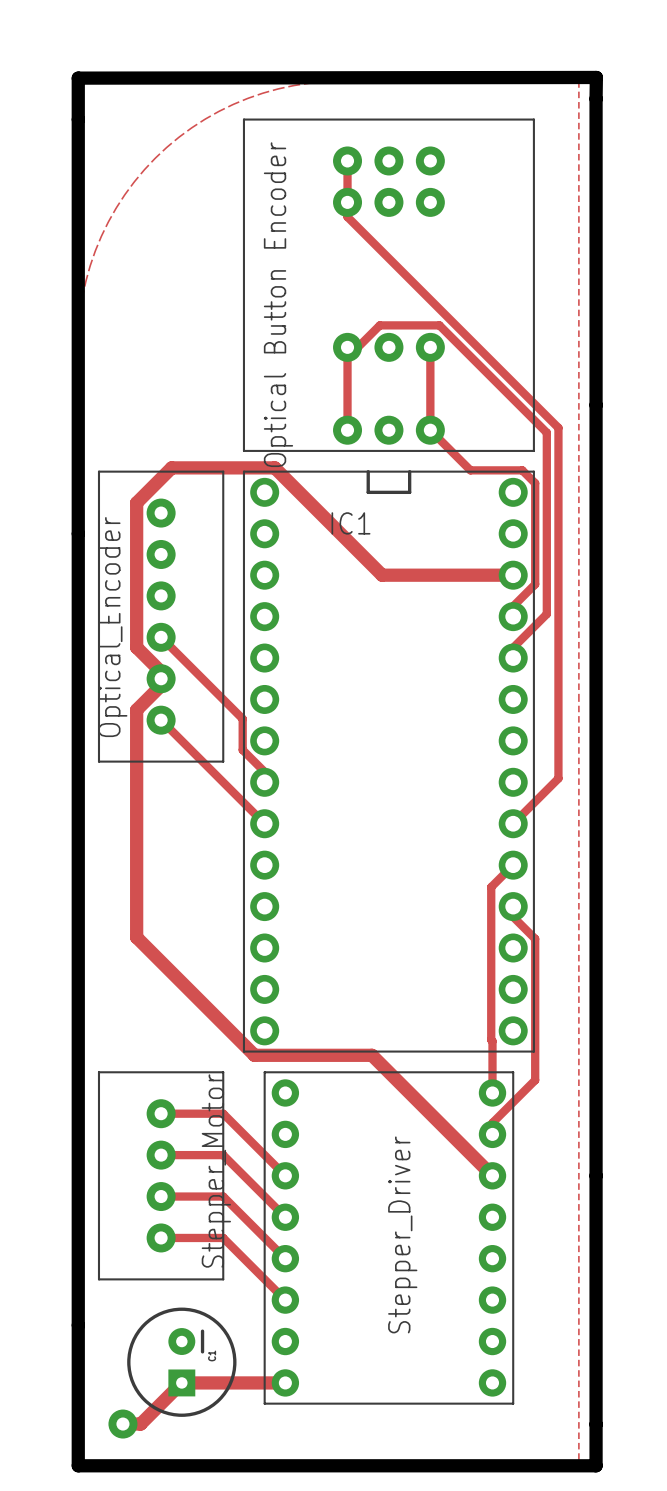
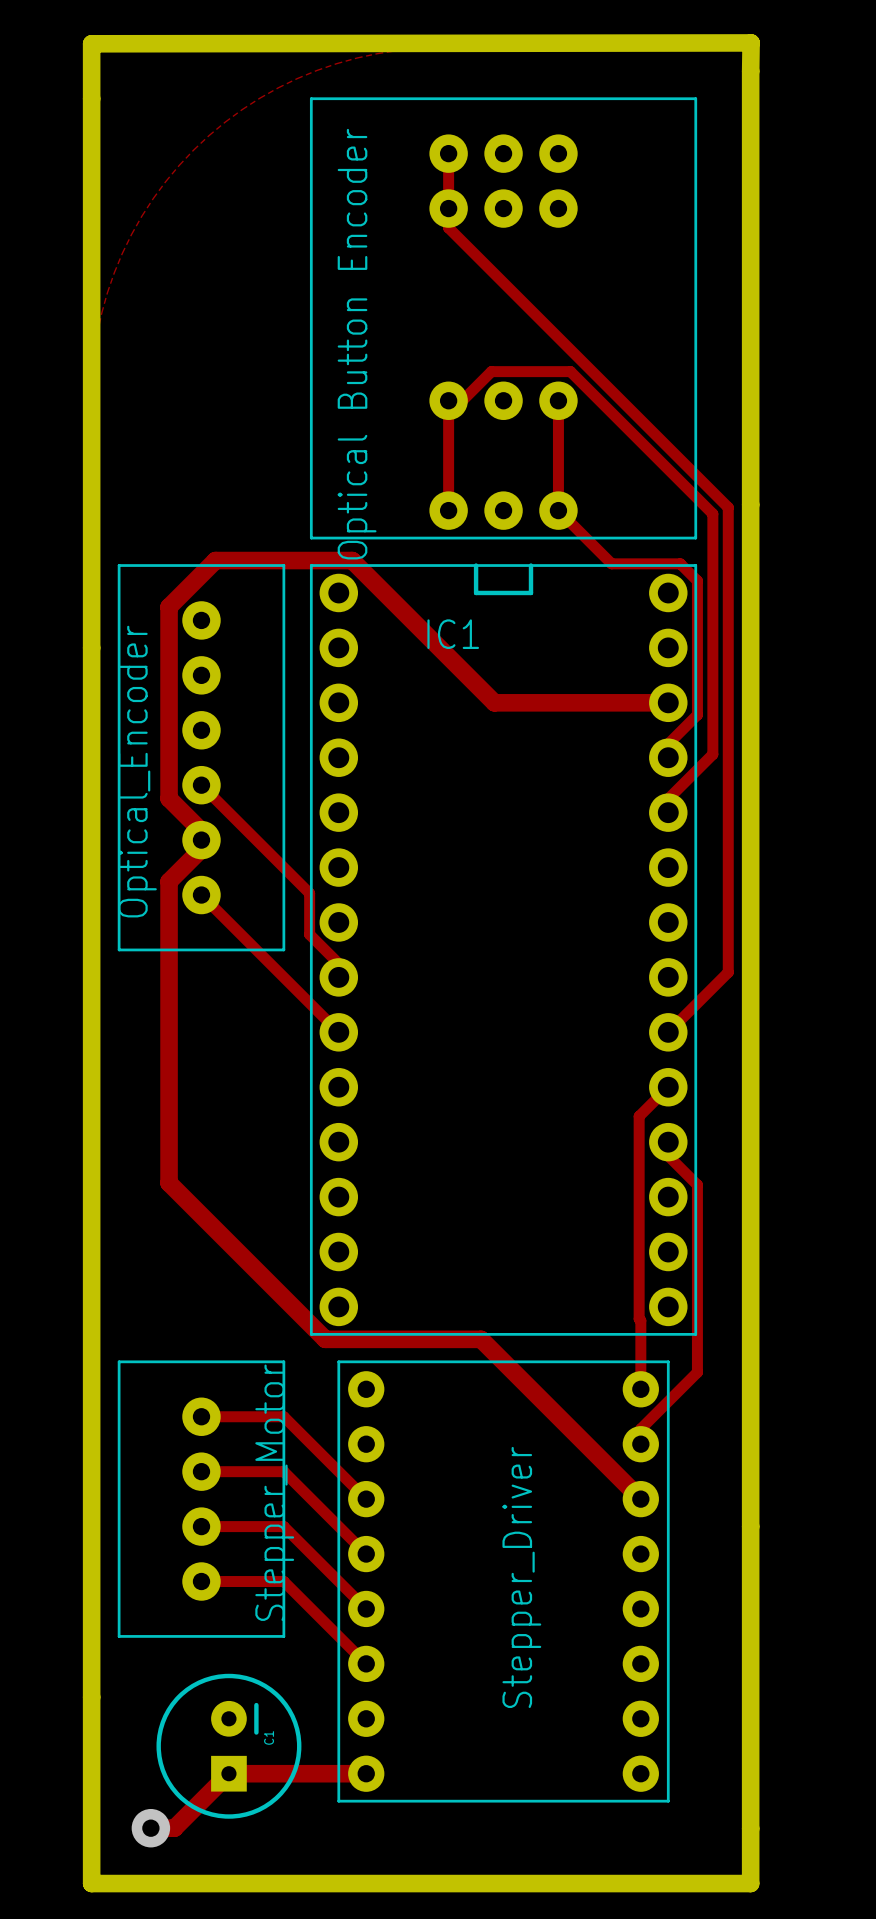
board edge: (575, 77) (596, 77) (596, 1465) (575, 1465) -> (751, 42) (750, 1883)

